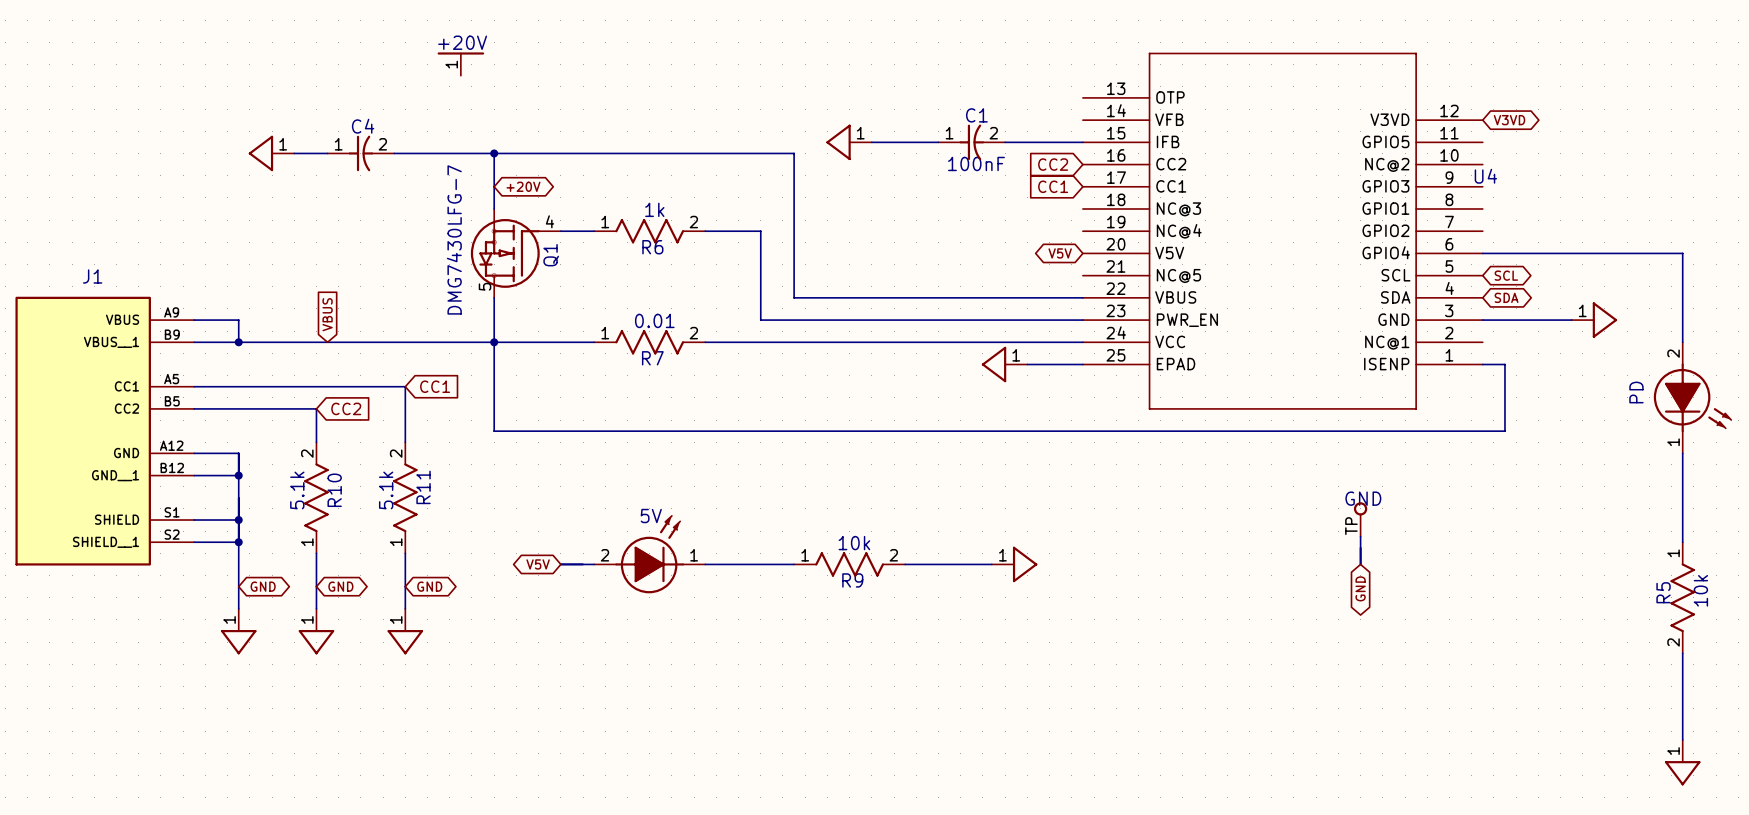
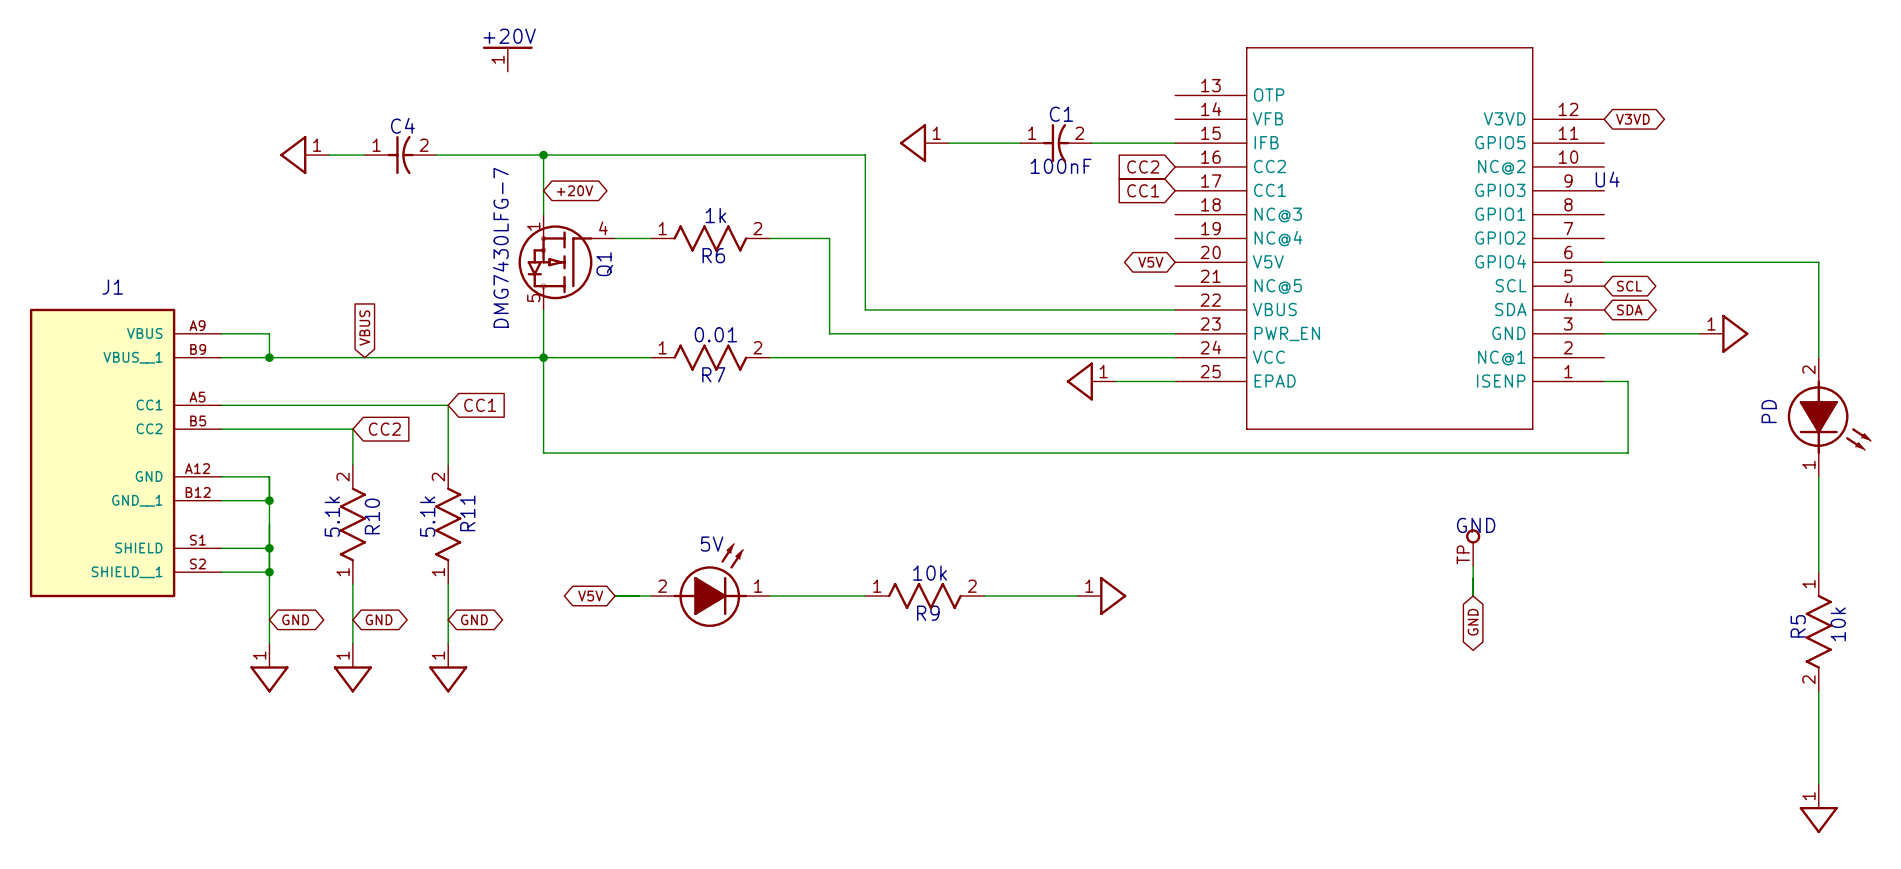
part pin number: none -> 1 (533, 226)

